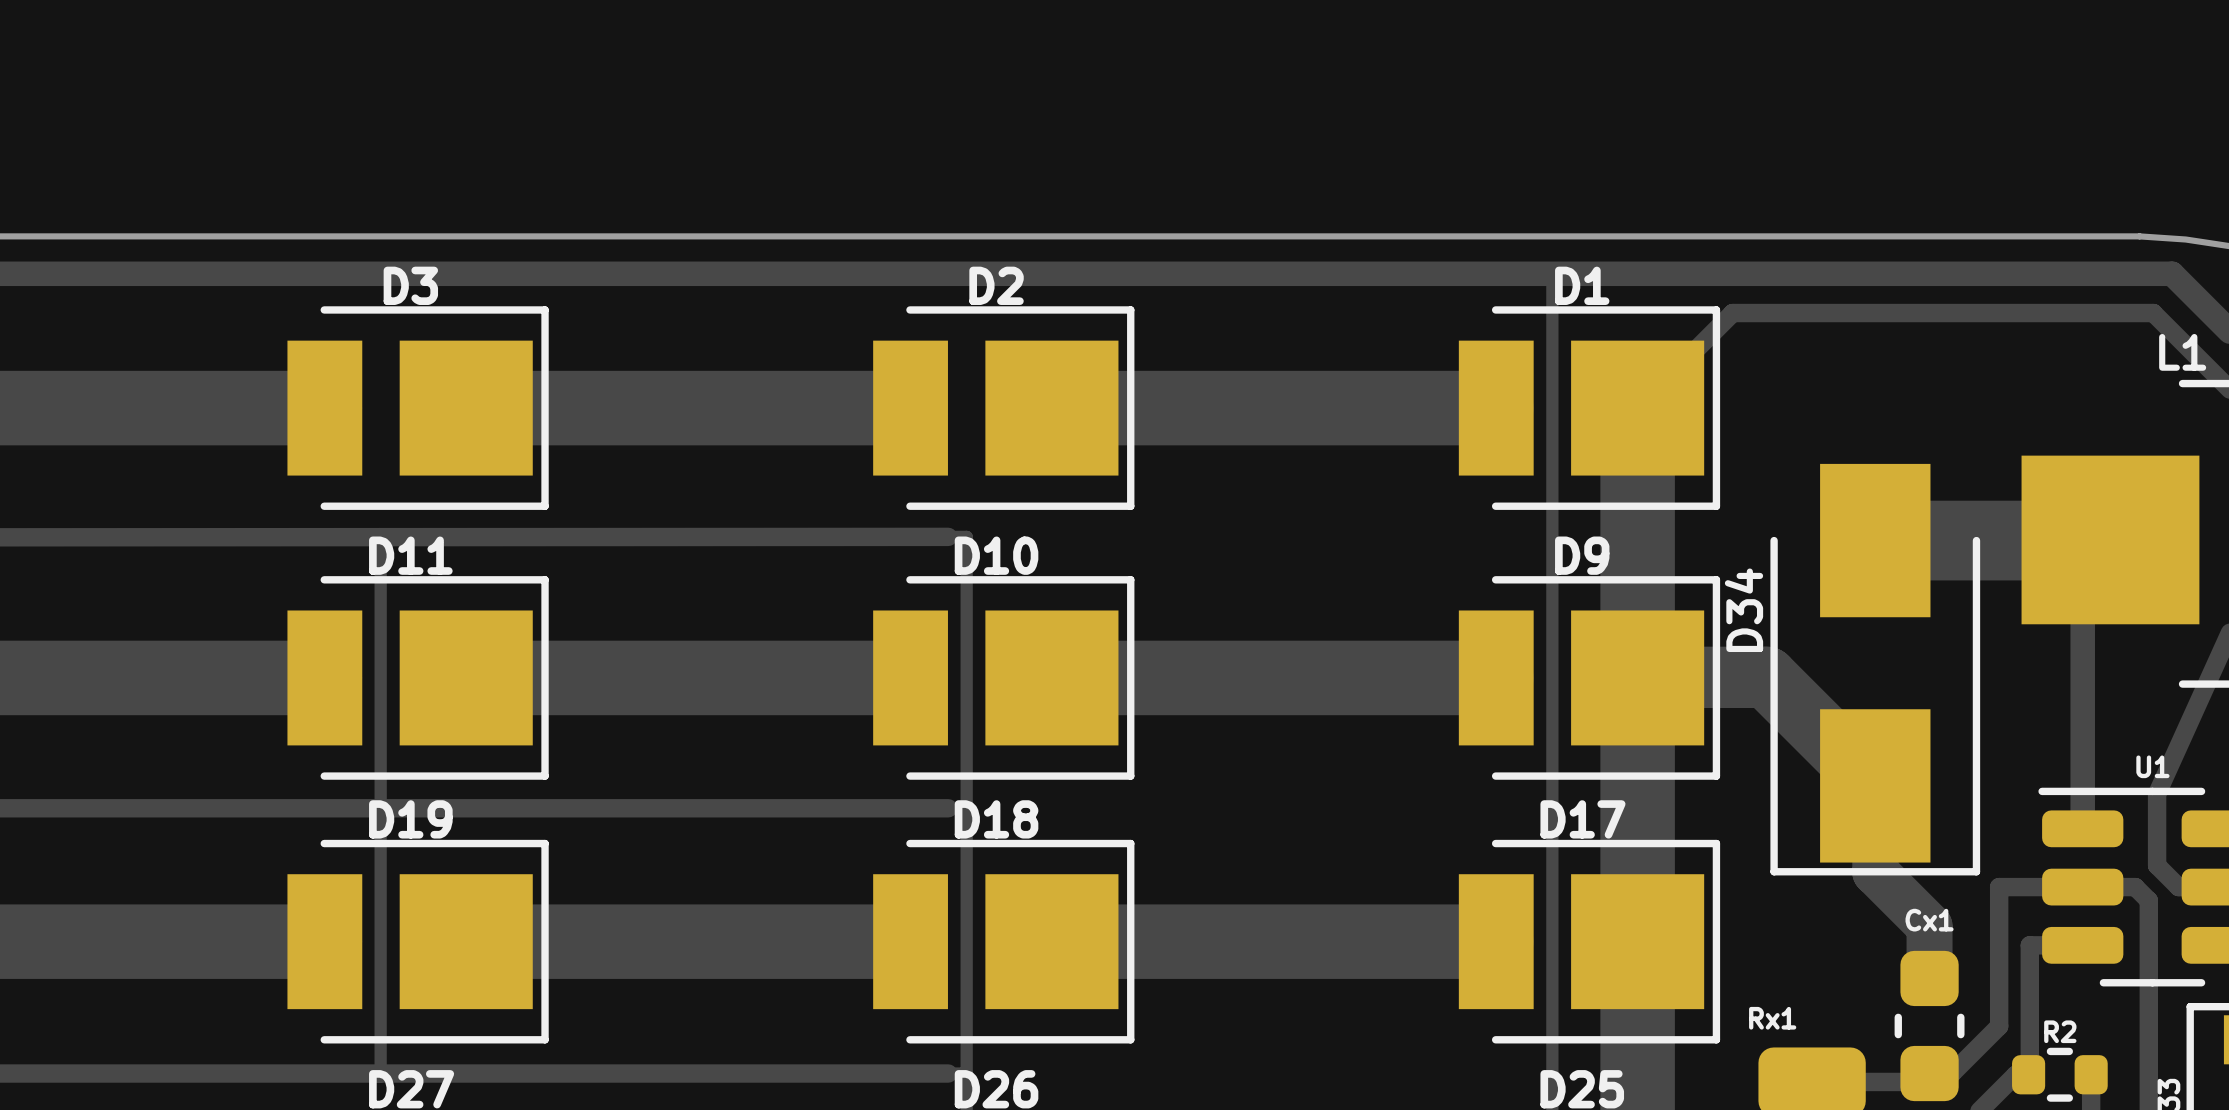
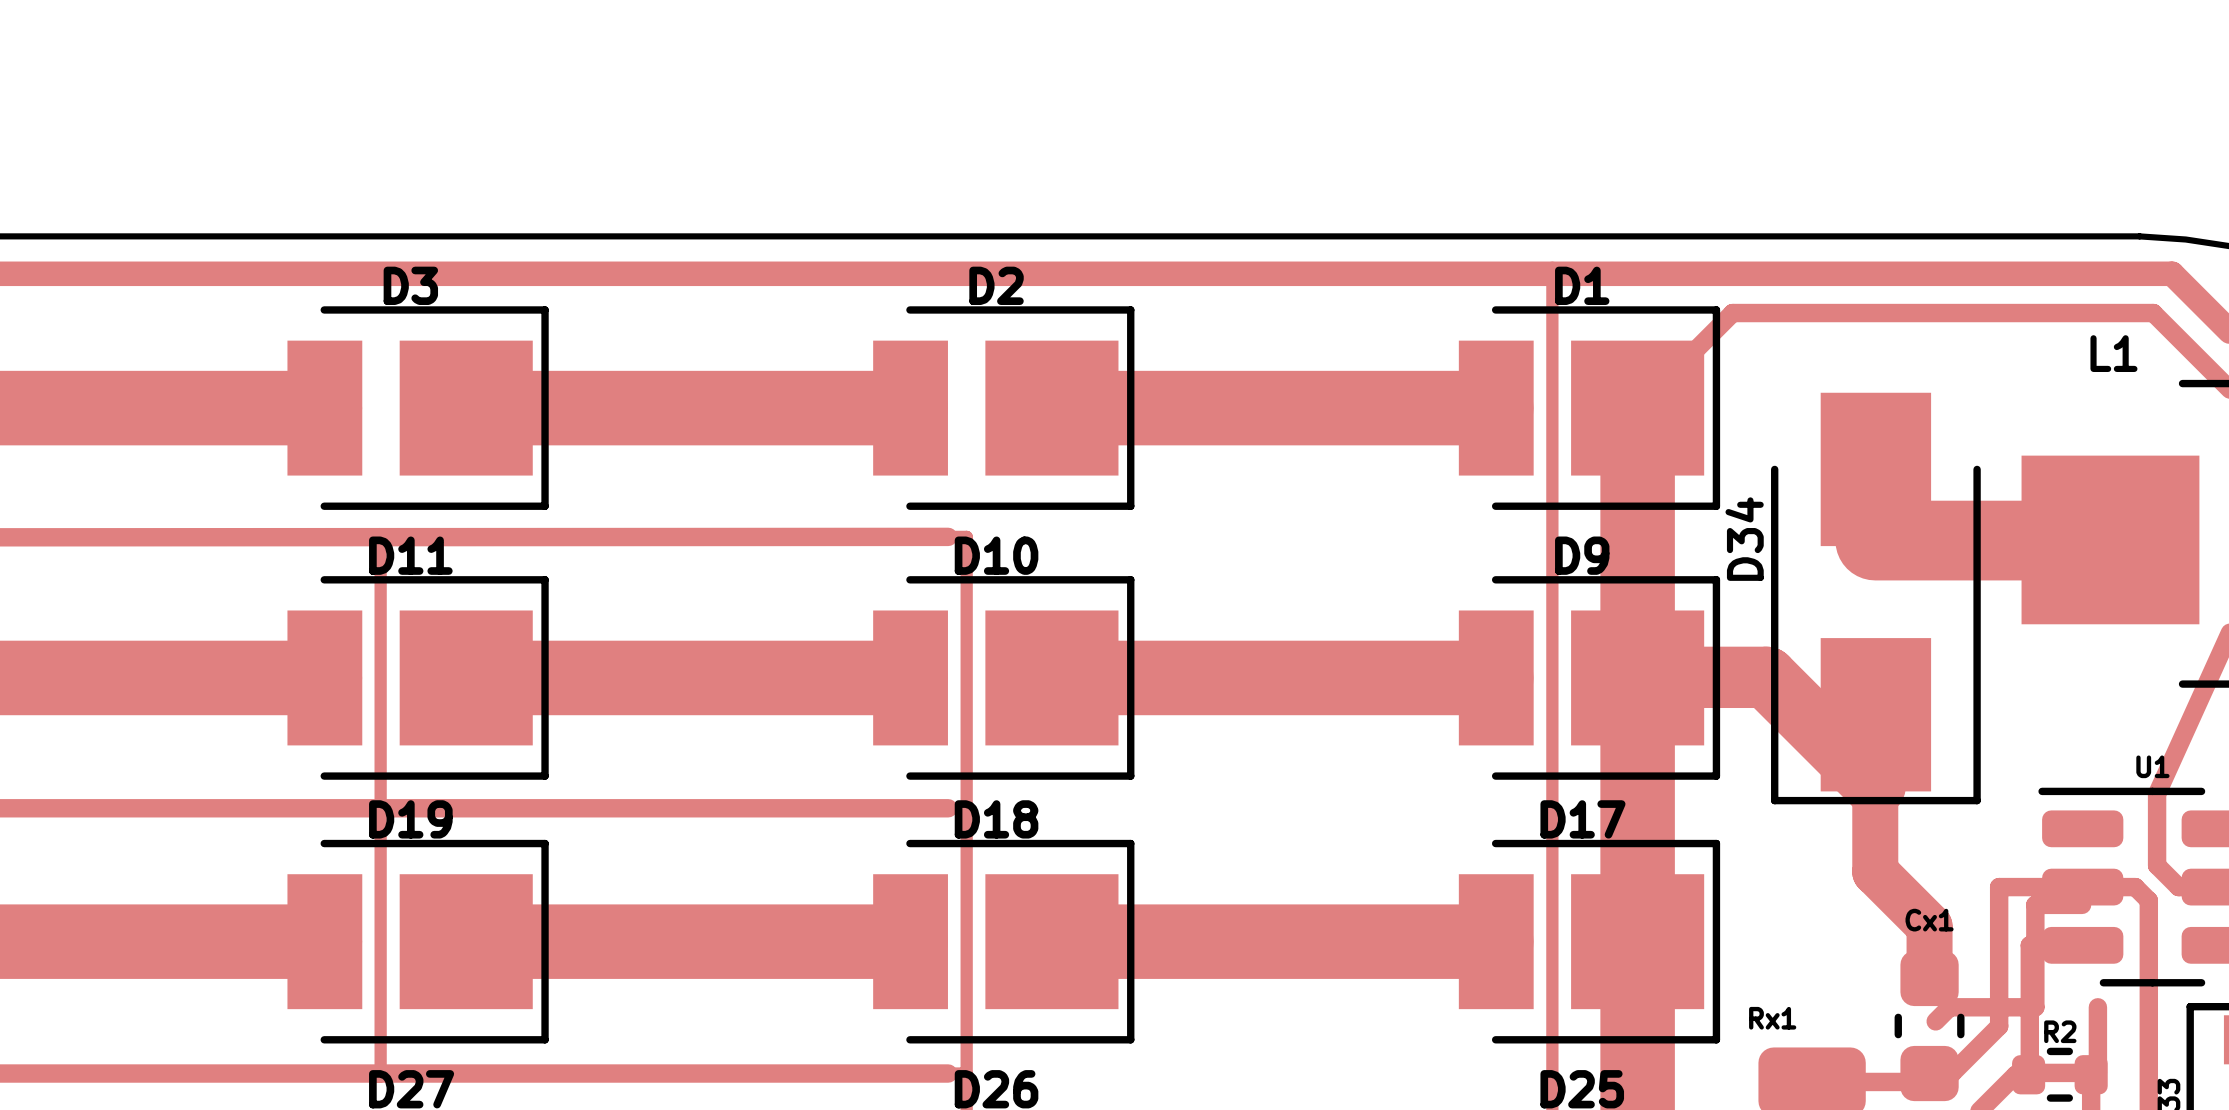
L1 name position: L1 (2182, 352) -> L1 (2113, 353)
track: (2110, 539) (2082, 567) (2082, 828) -> none
D34 position: (1875, 669) -> (1875, 598)
track: none -> (2082, 904) (2035, 904) (2035, 1007) (1949, 1007) (1935, 1021)
track: none -> (2097, 1007) (2097, 1072) (2029, 1072)

